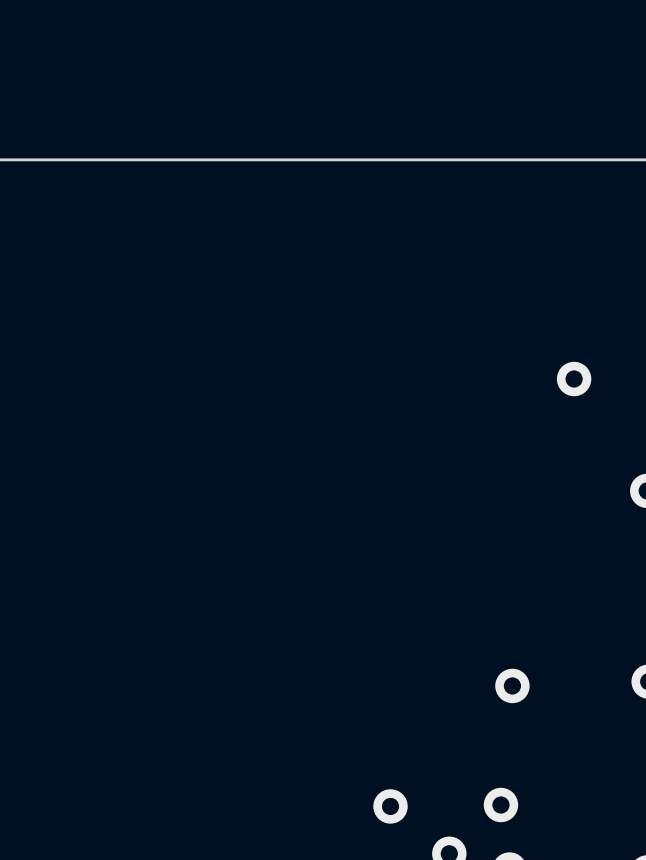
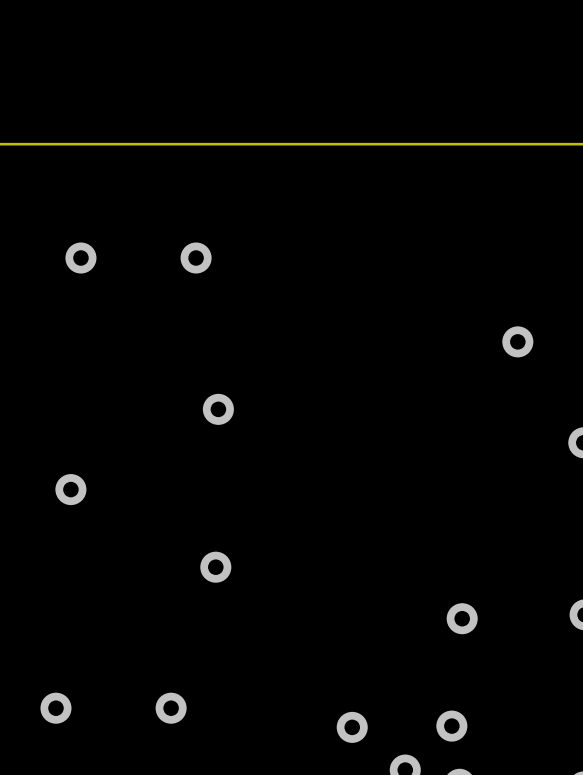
via: none -> (80, 258)
via: none -> (196, 258)
via: none -> (218, 409)
via: none -> (70, 489)
via: none -> (215, 567)
via: none -> (55, 708)
via: none -> (171, 708)

